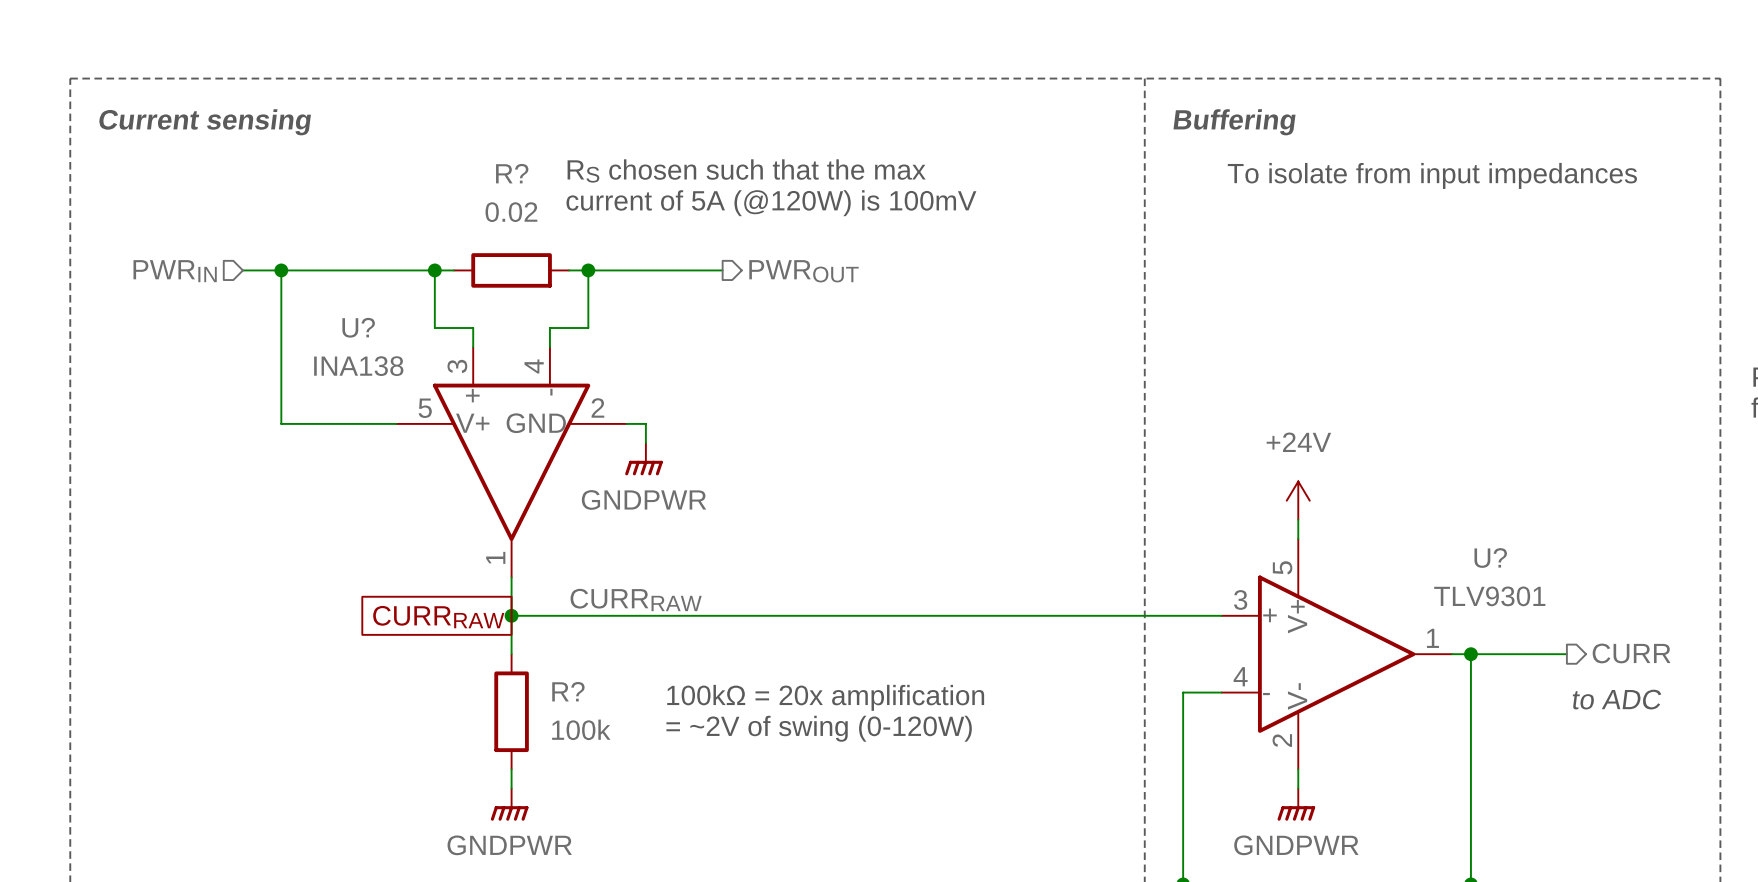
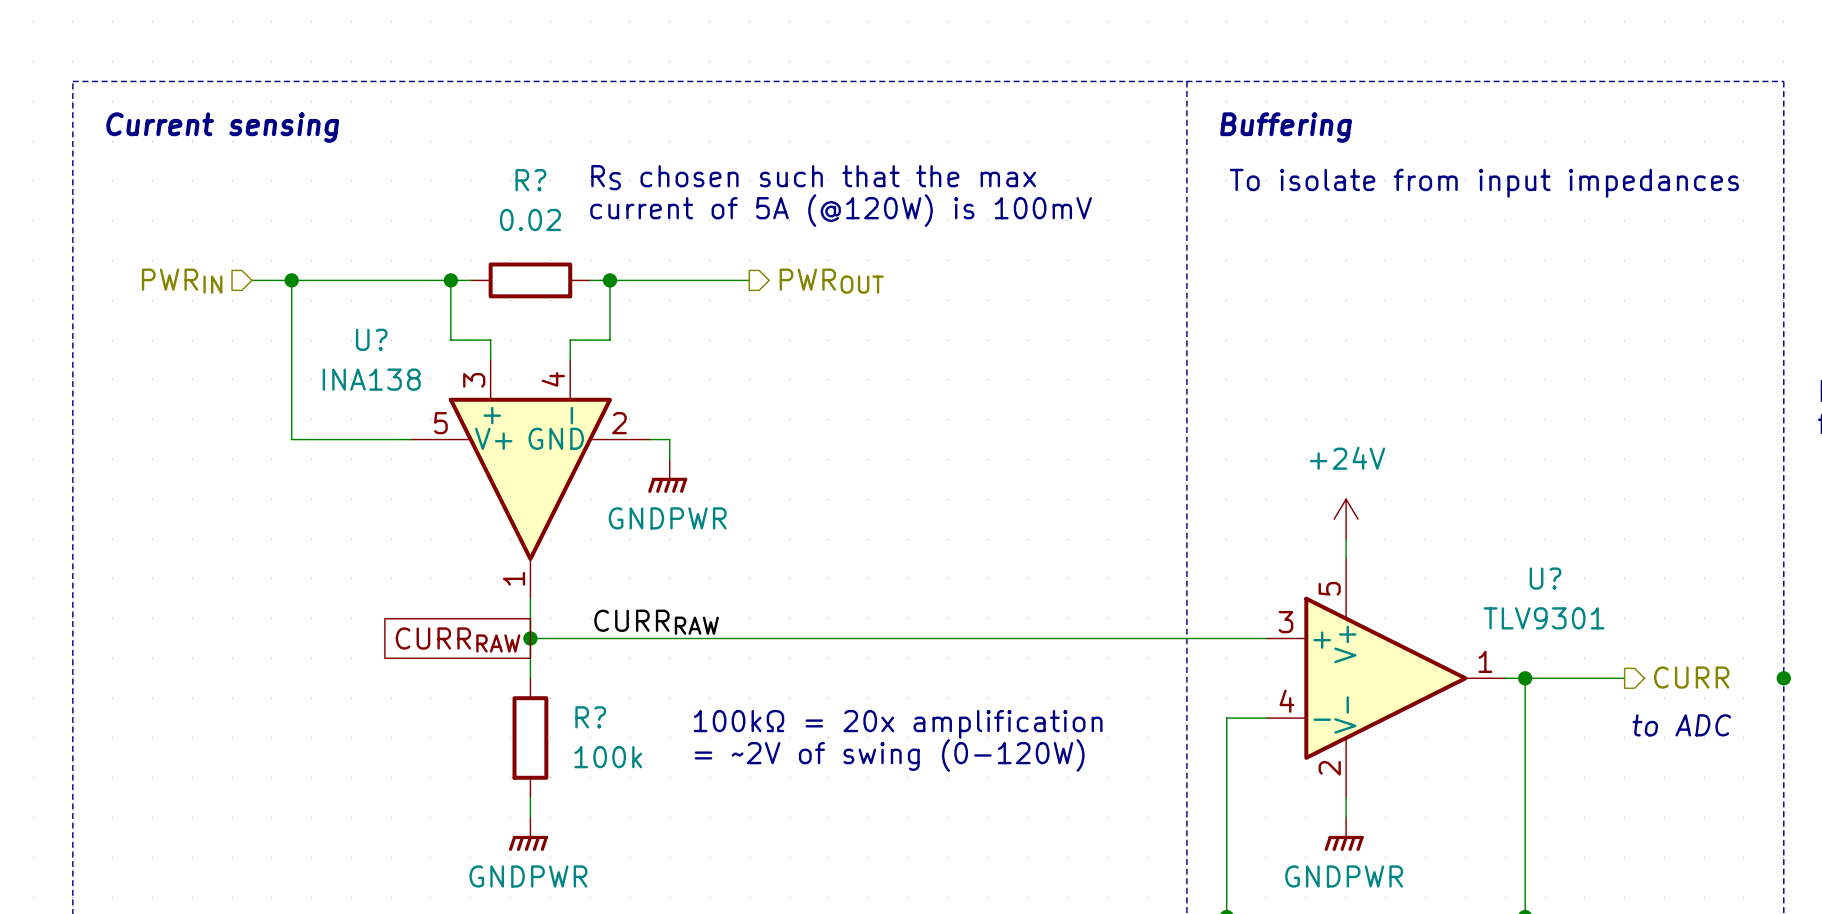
junction: none -> (1783, 678)

